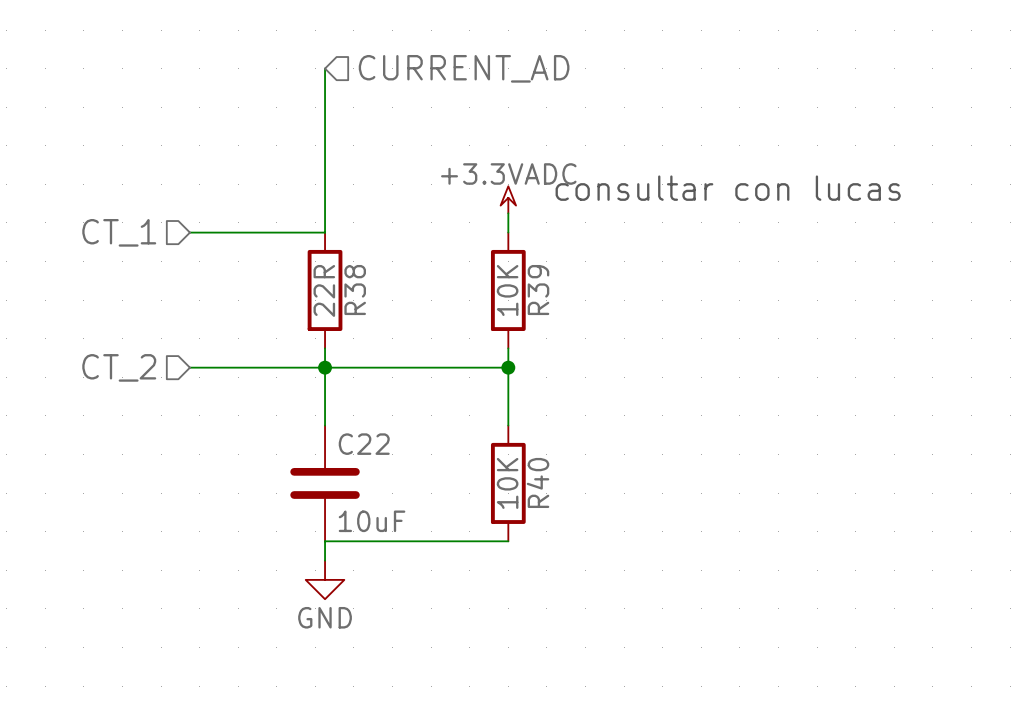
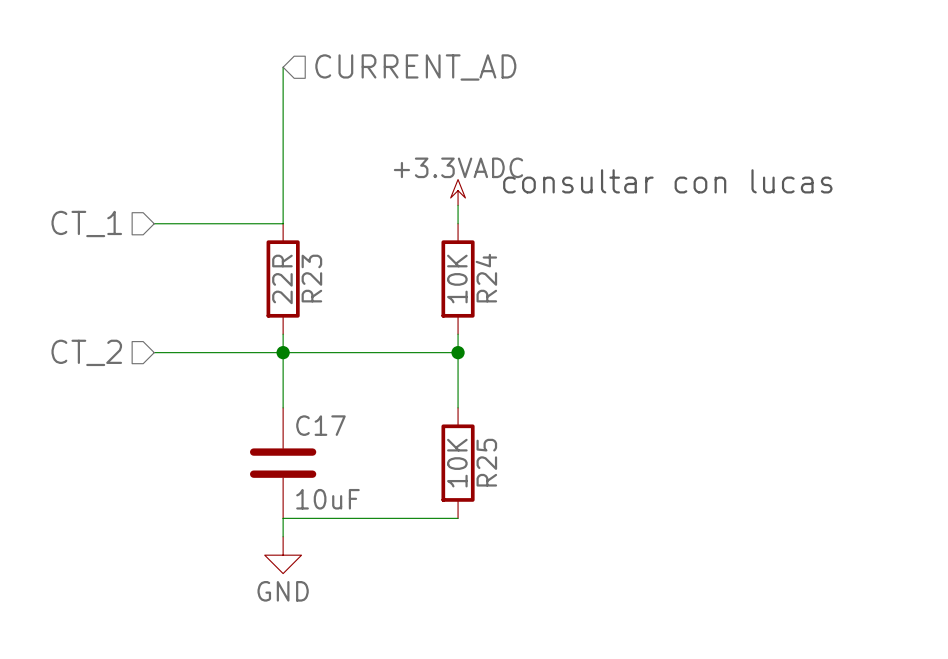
R38 name: R38 (355, 290) -> R23 (311, 278)
R39 name: R39 (538, 290) -> R24 (486, 278)
C22 name: C22 (364, 444) -> C17 (320, 425)
R40 name: R40 (538, 482) -> R25 (486, 462)

